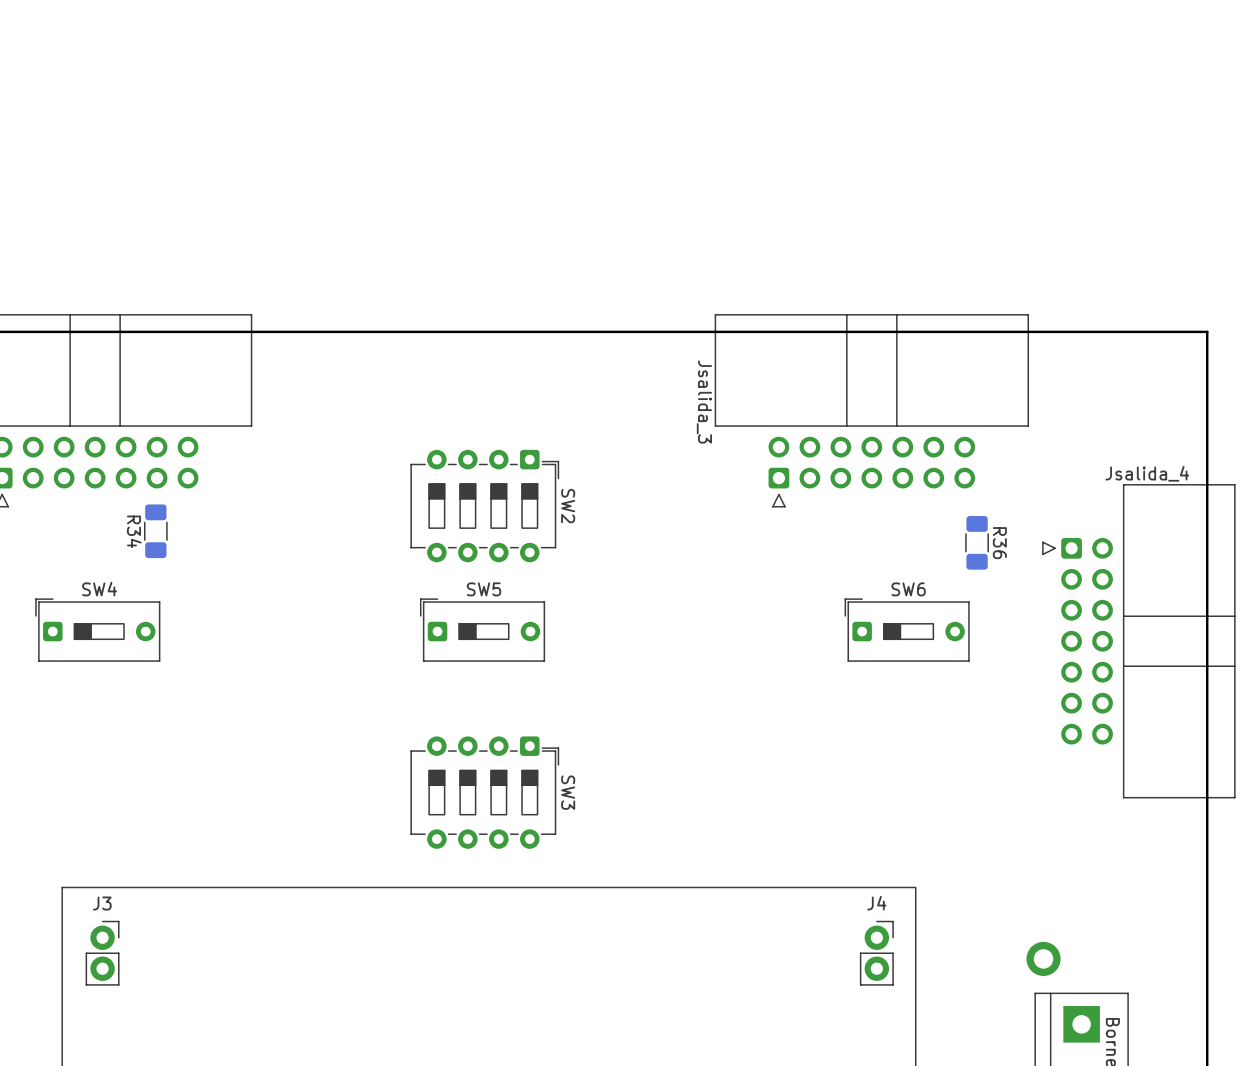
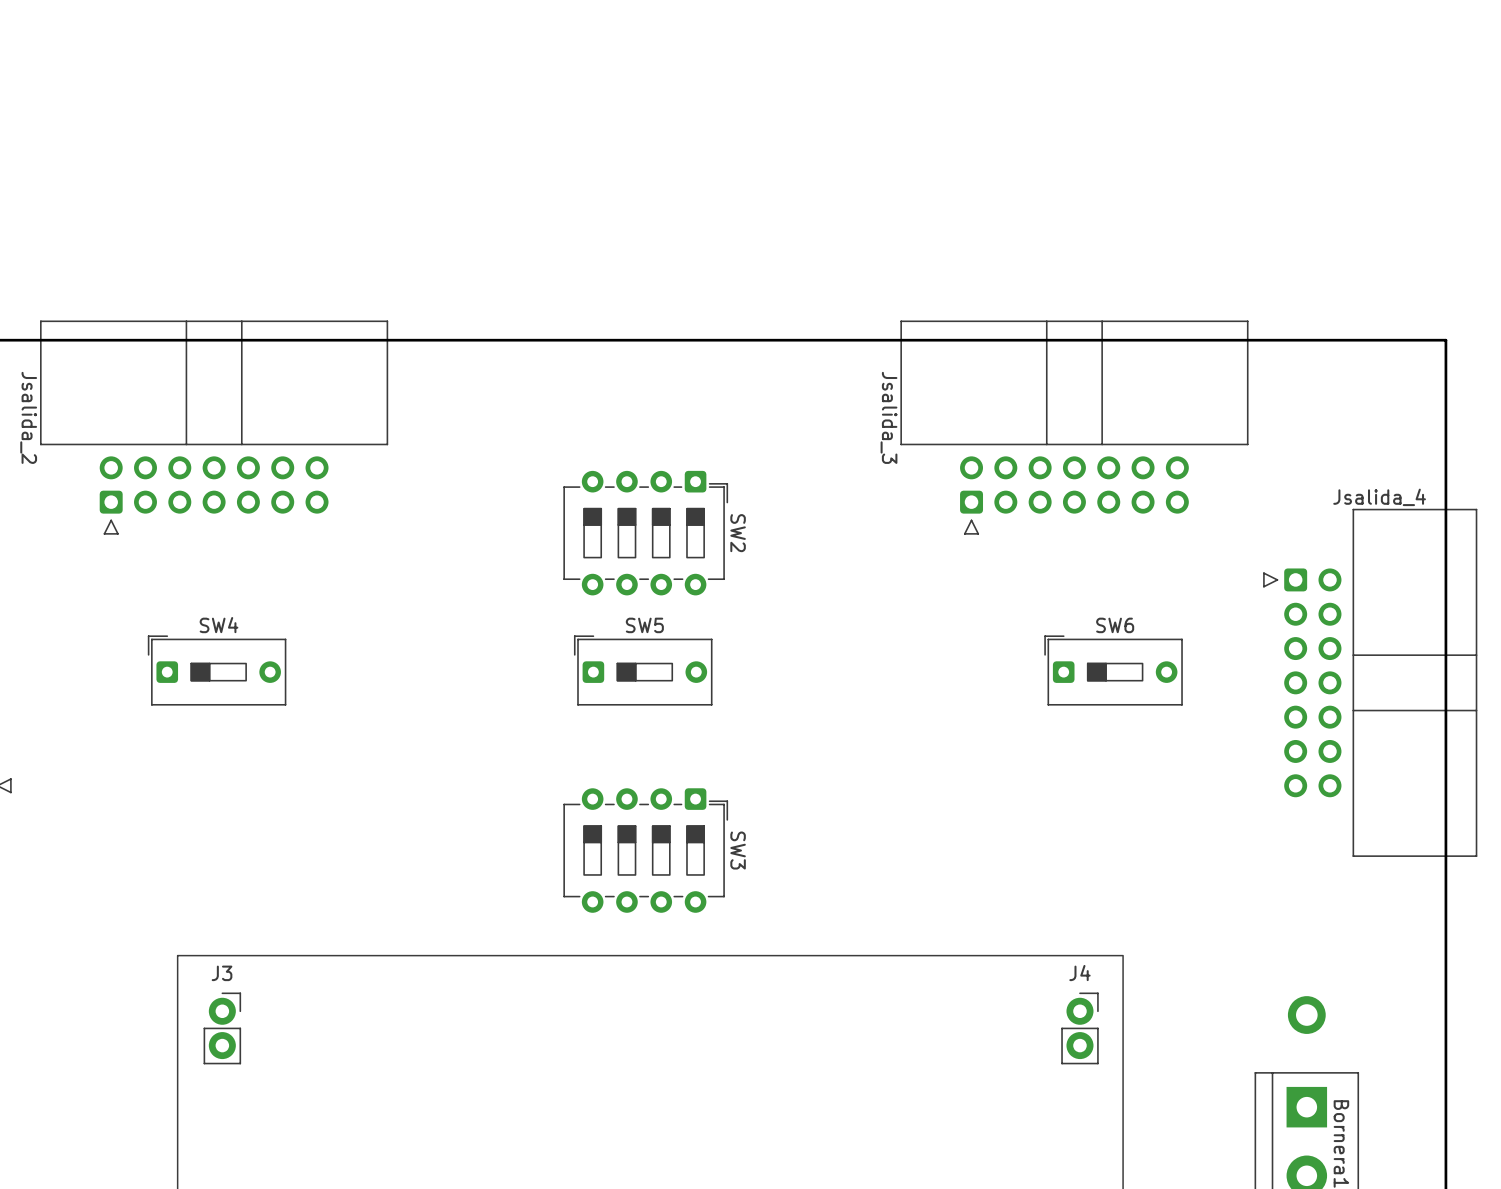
R34: (155, 531) -> none
R36: (977, 542) -> none
part position: (1043, 958) -> (1306, 1015)

